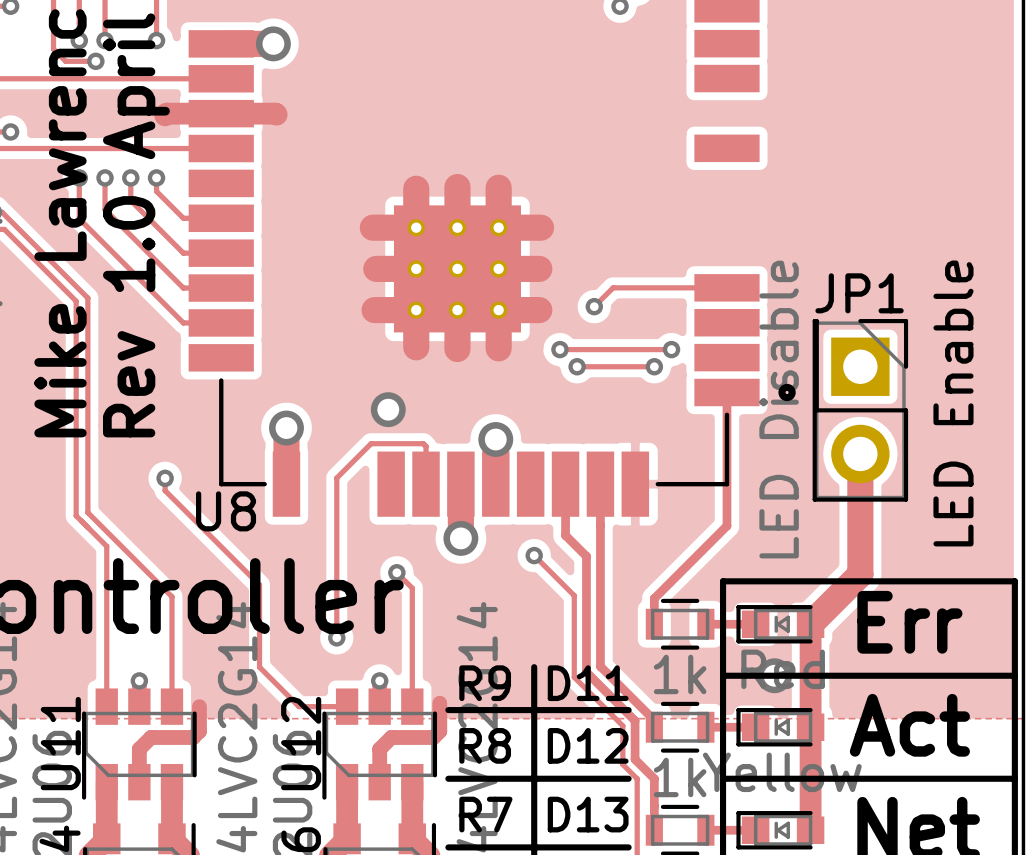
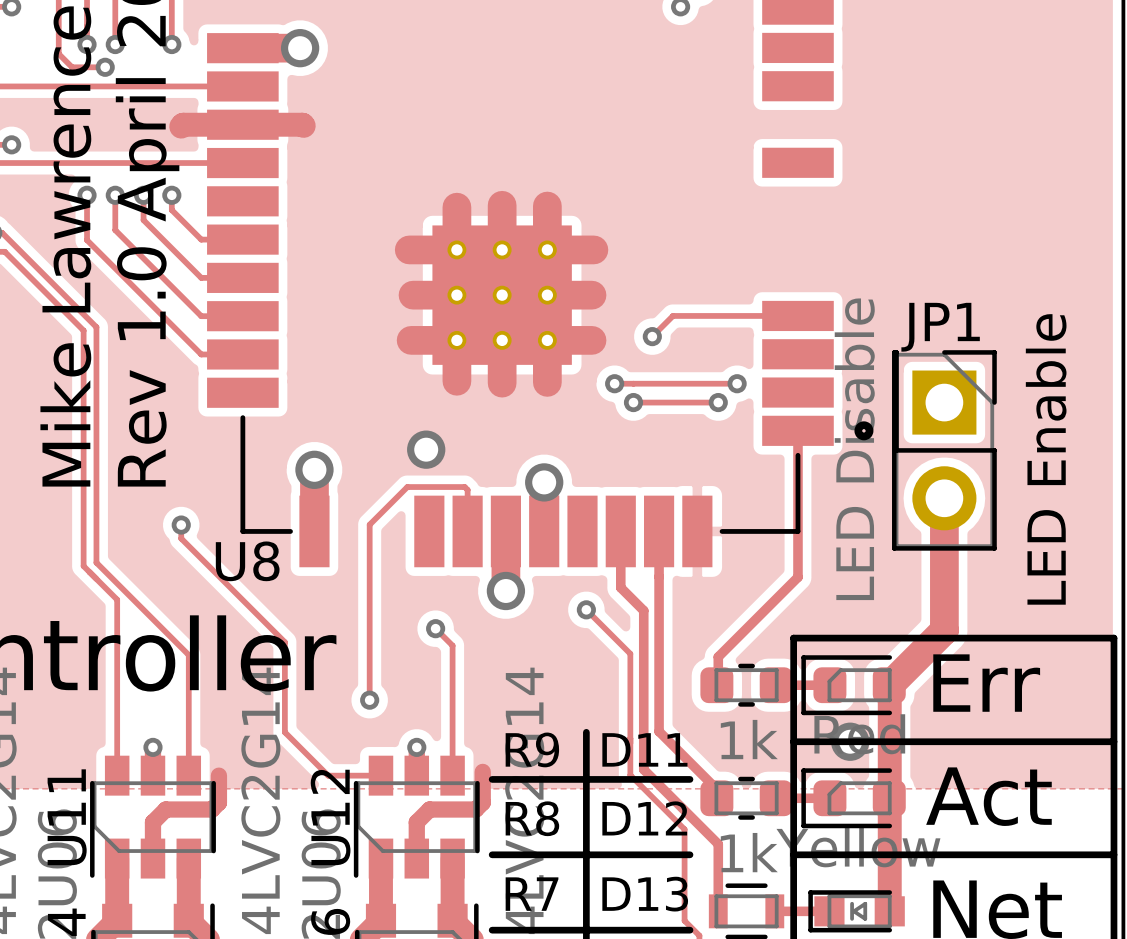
R9 footprint: [645, 598, 715, 650] -> [700, 663, 793, 707]
D11 footprint: [736, 605, 825, 644] -> [801, 655, 906, 716]
track: (586, 672) (635, 720) (635, 759) (654, 778) -> (643, 737) (643, 769) (718, 844) (718, 854)
track: (574, 677) (622, 725) (622, 764) (637, 778) (637, 852) -> (630, 743) (630, 775) (684, 829) (684, 920) (699, 935)
R8 footprint: [645, 701, 715, 753] -> [700, 776, 793, 820]
D12 footprint: [736, 708, 825, 747] -> [801, 768, 906, 829]

